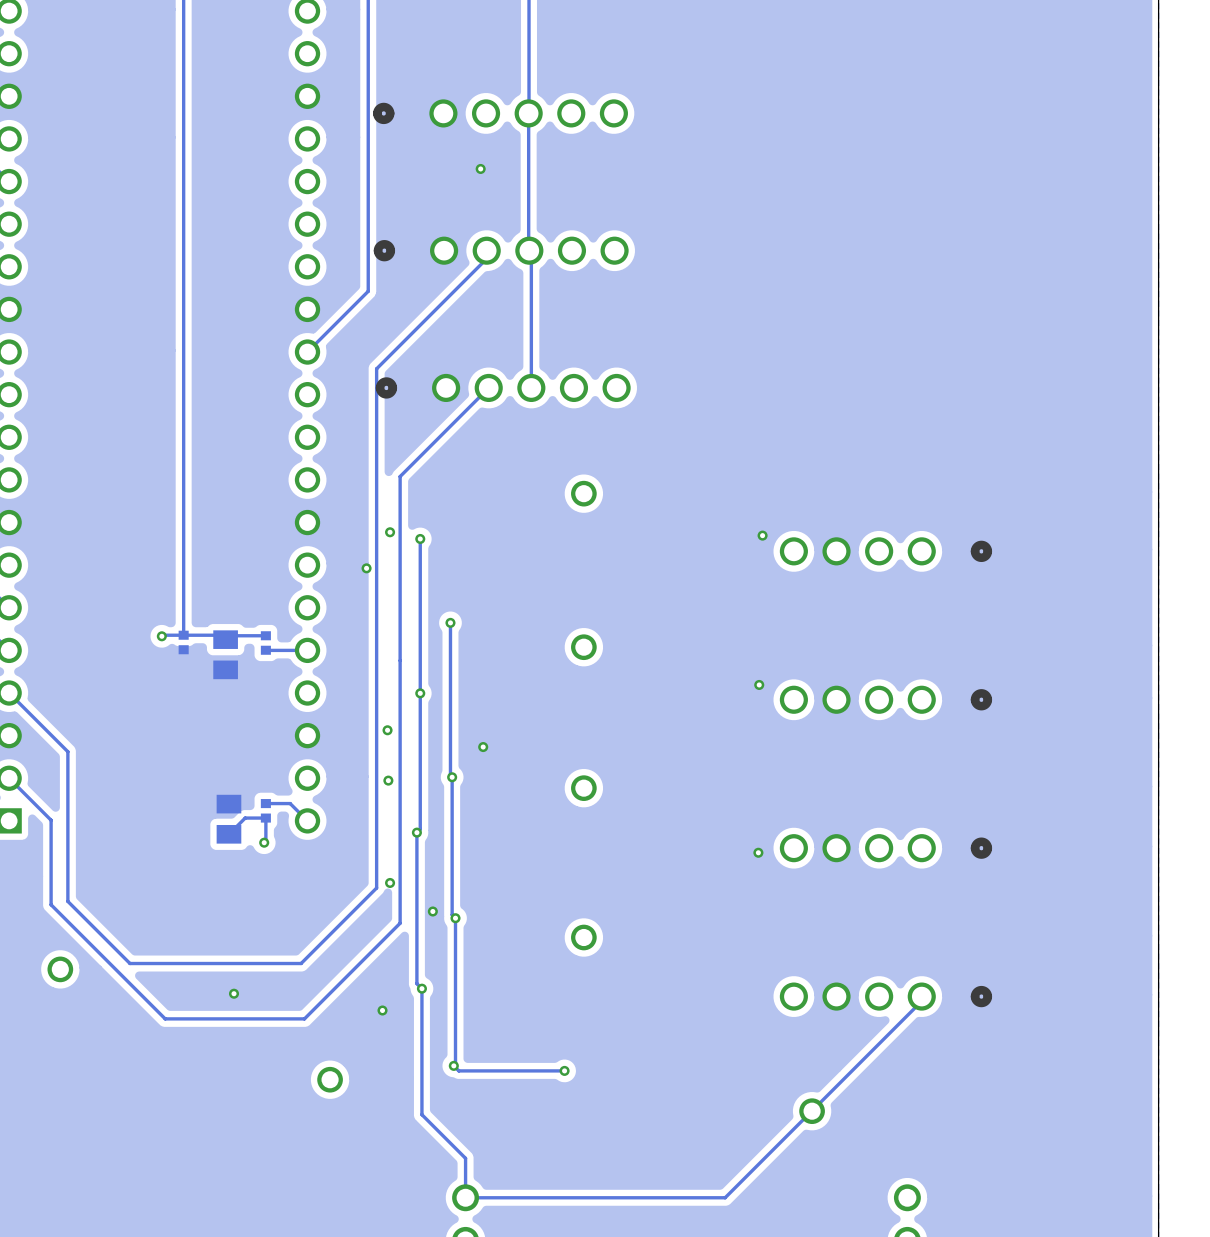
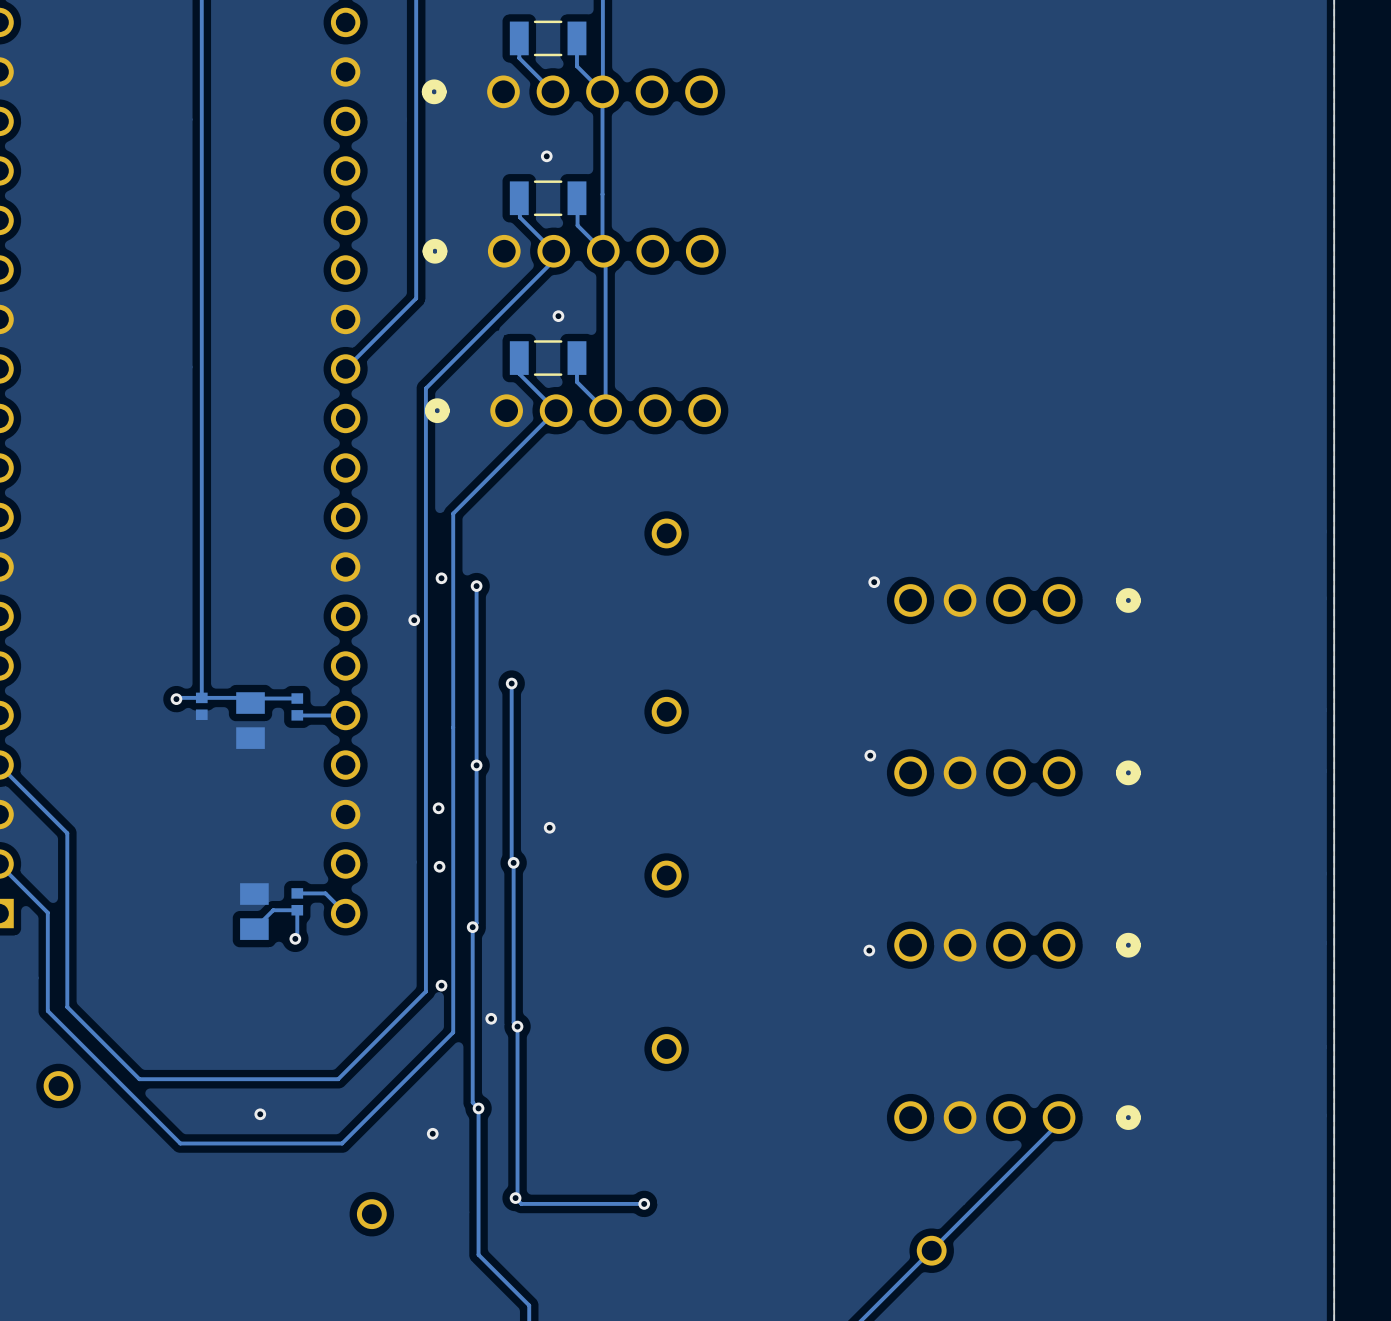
part: none -> (548, 38)
track: none -> (519, 40) (519, 58) (553, 91)
track: none -> (576, 40) (576, 66) (602, 91)
track: none -> (519, 195) (519, 217) (553, 251)
track: none -> (577, 195) (577, 225) (603, 251)
part: none -> (548, 198)
via: none -> (558, 316)
track: none -> (519, 358) (519, 373) (556, 410)
part: none -> (548, 358)
track: none -> (576, 358) (576, 382) (605, 410)

